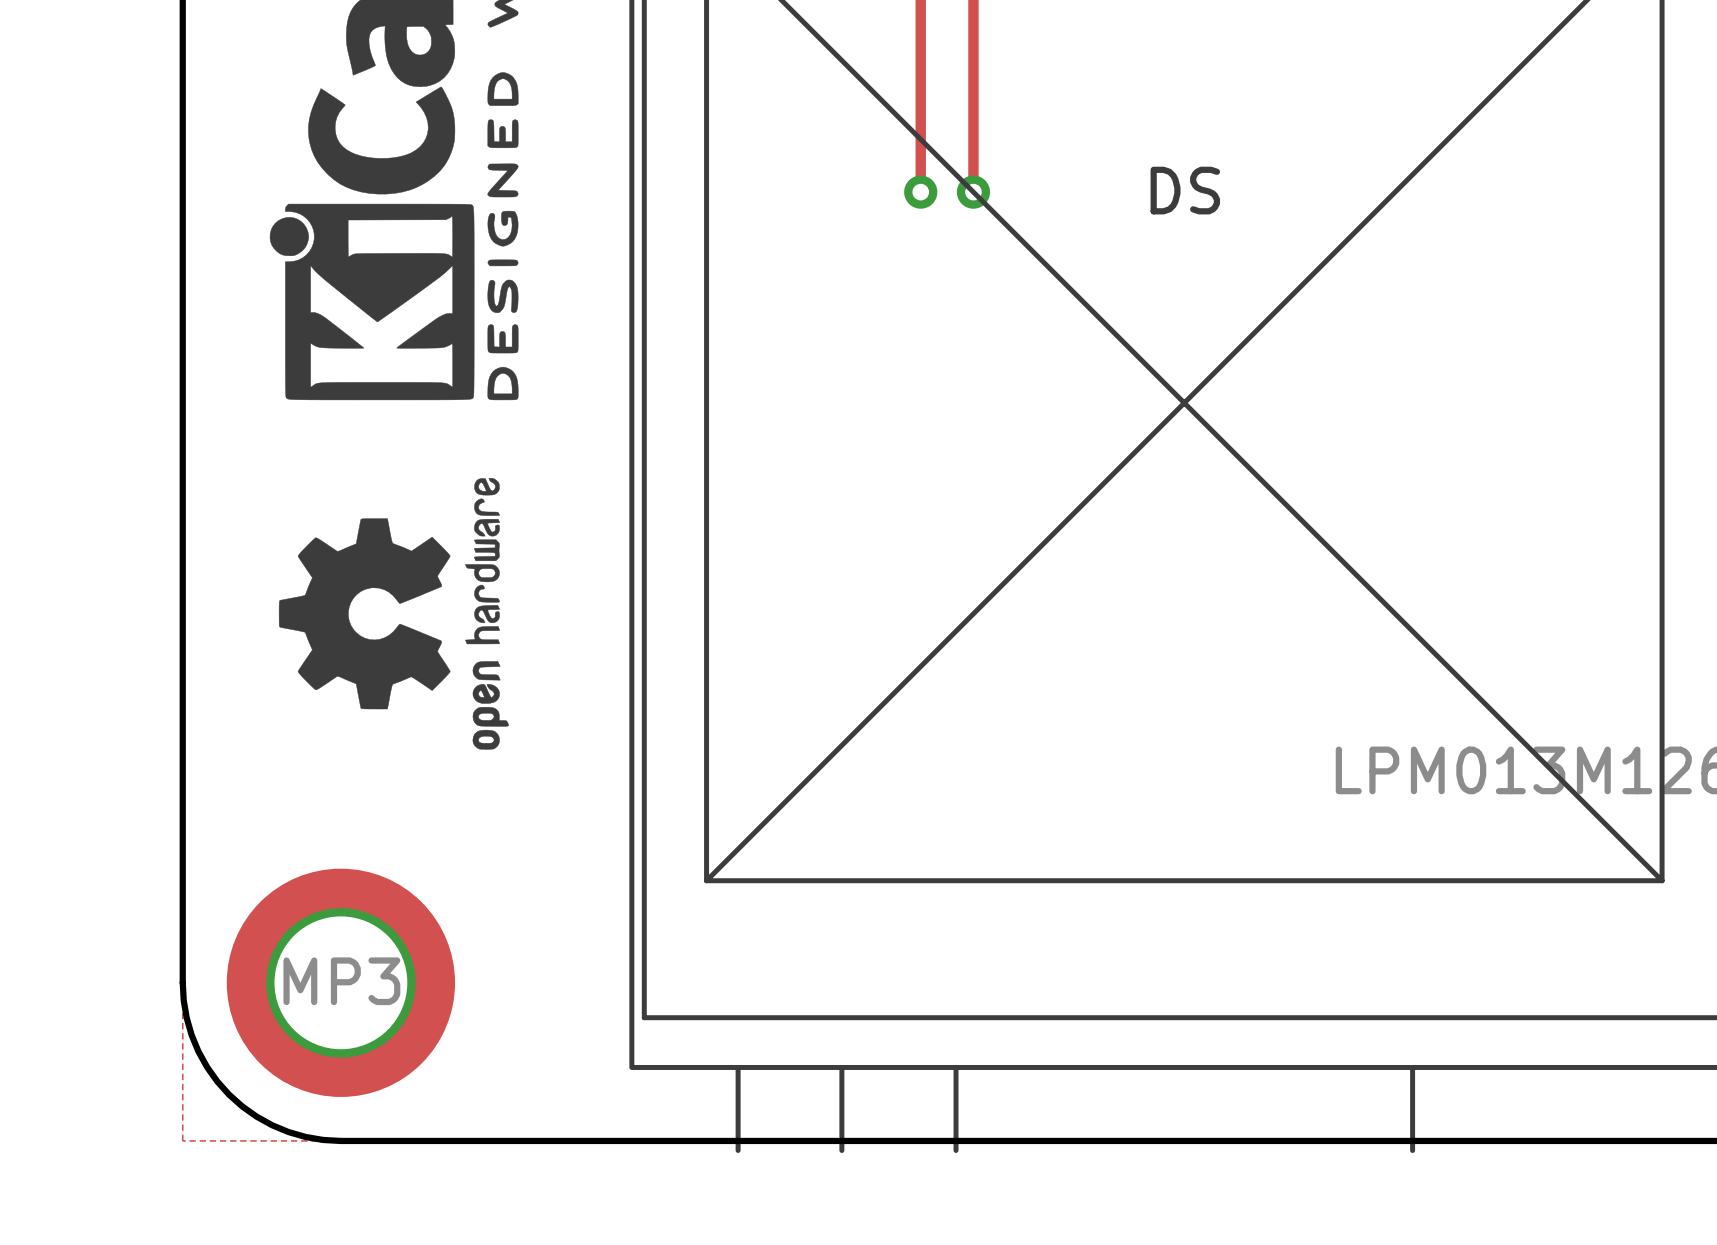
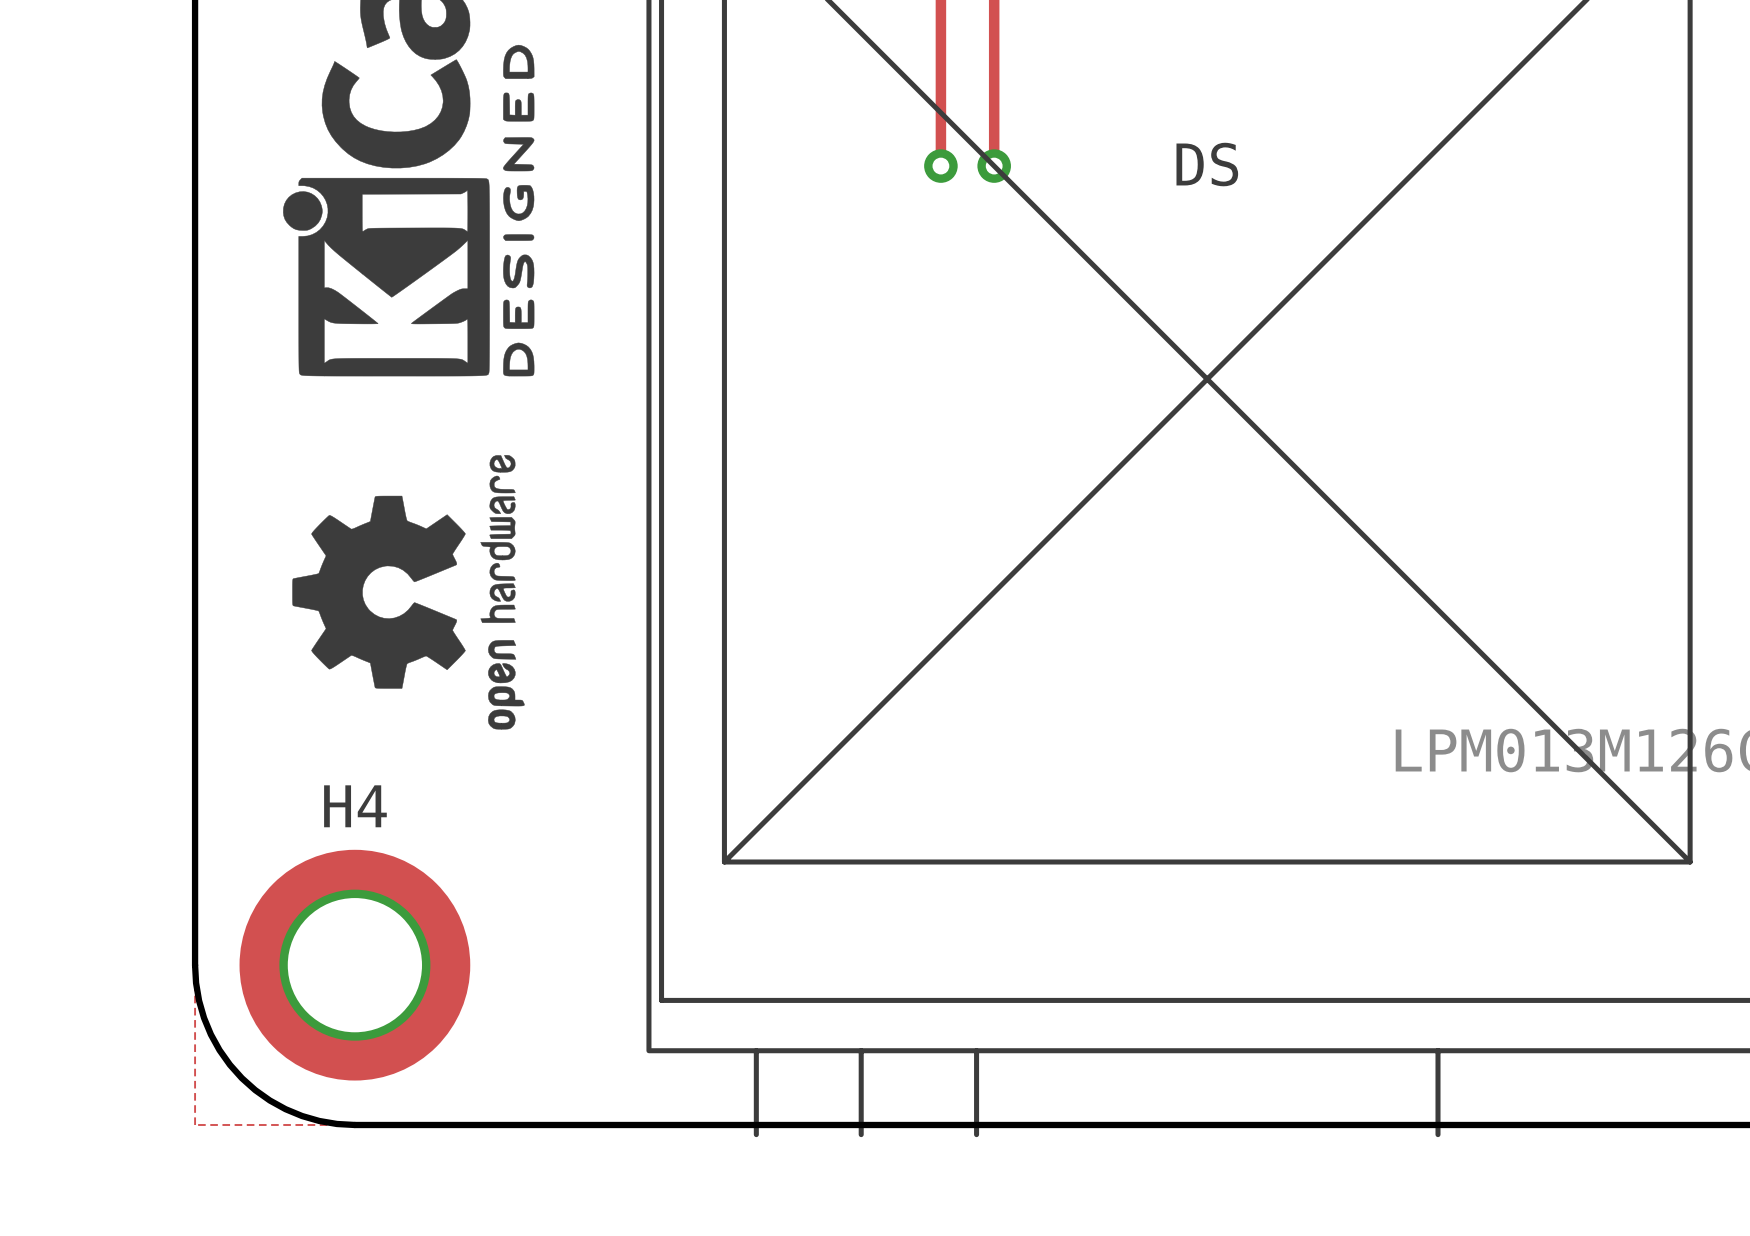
MP3 name: MP3 (341, 981) -> H4 (355, 806)

